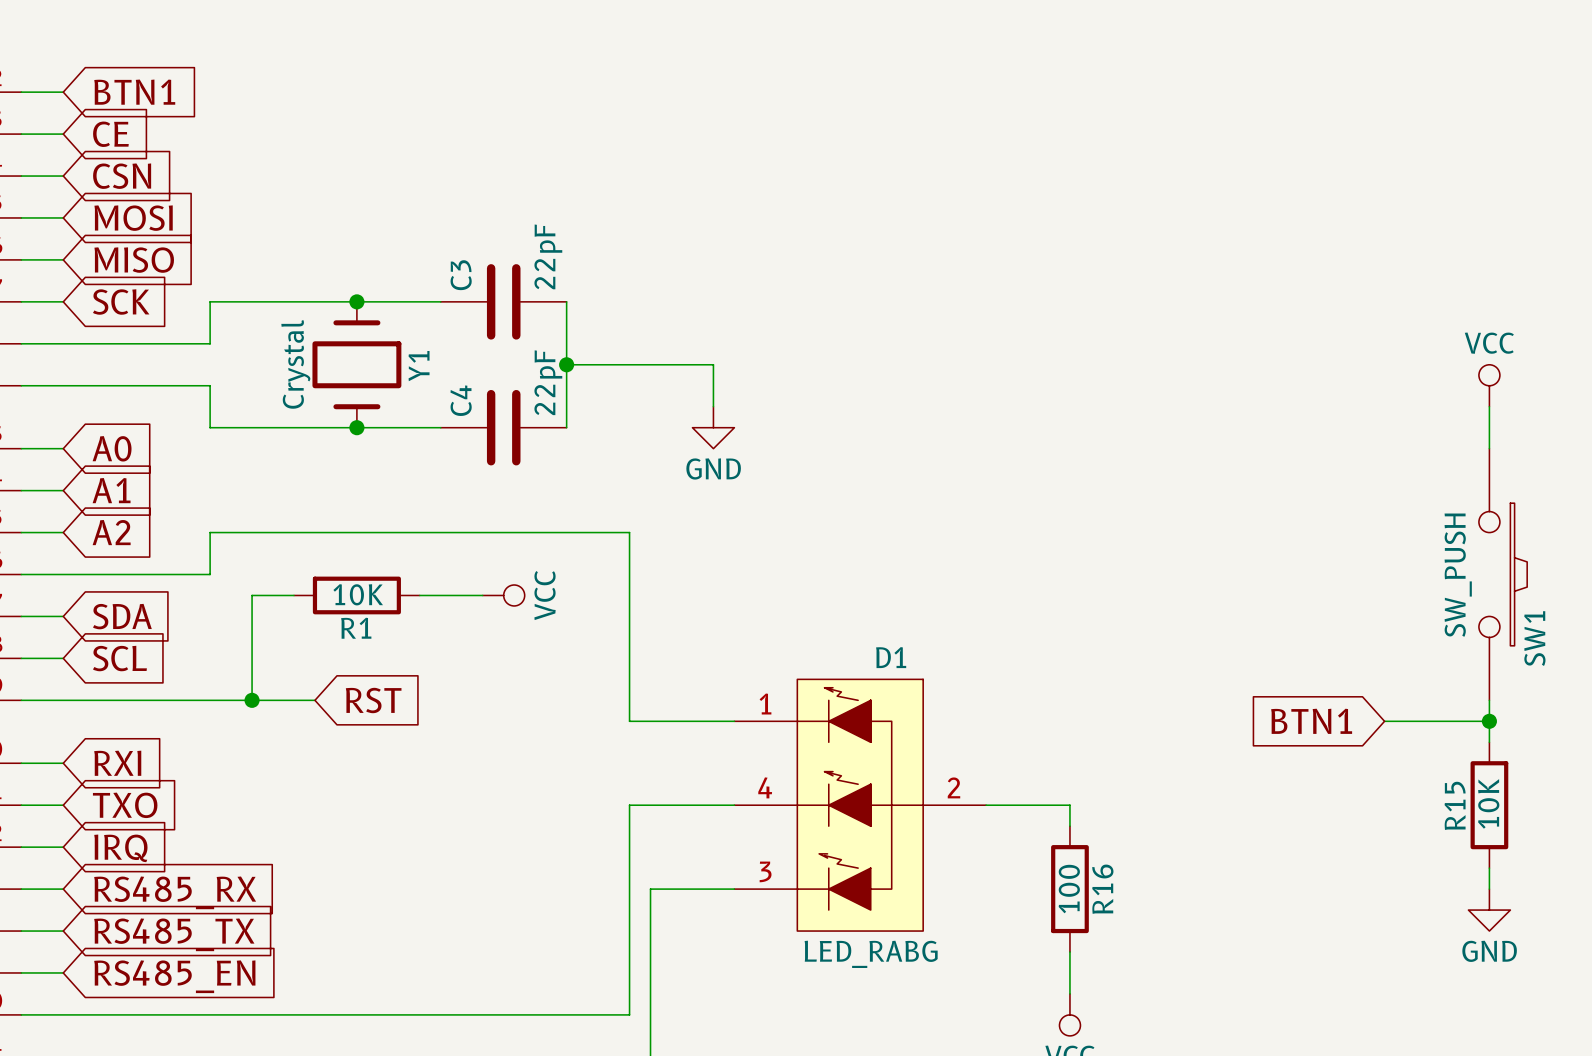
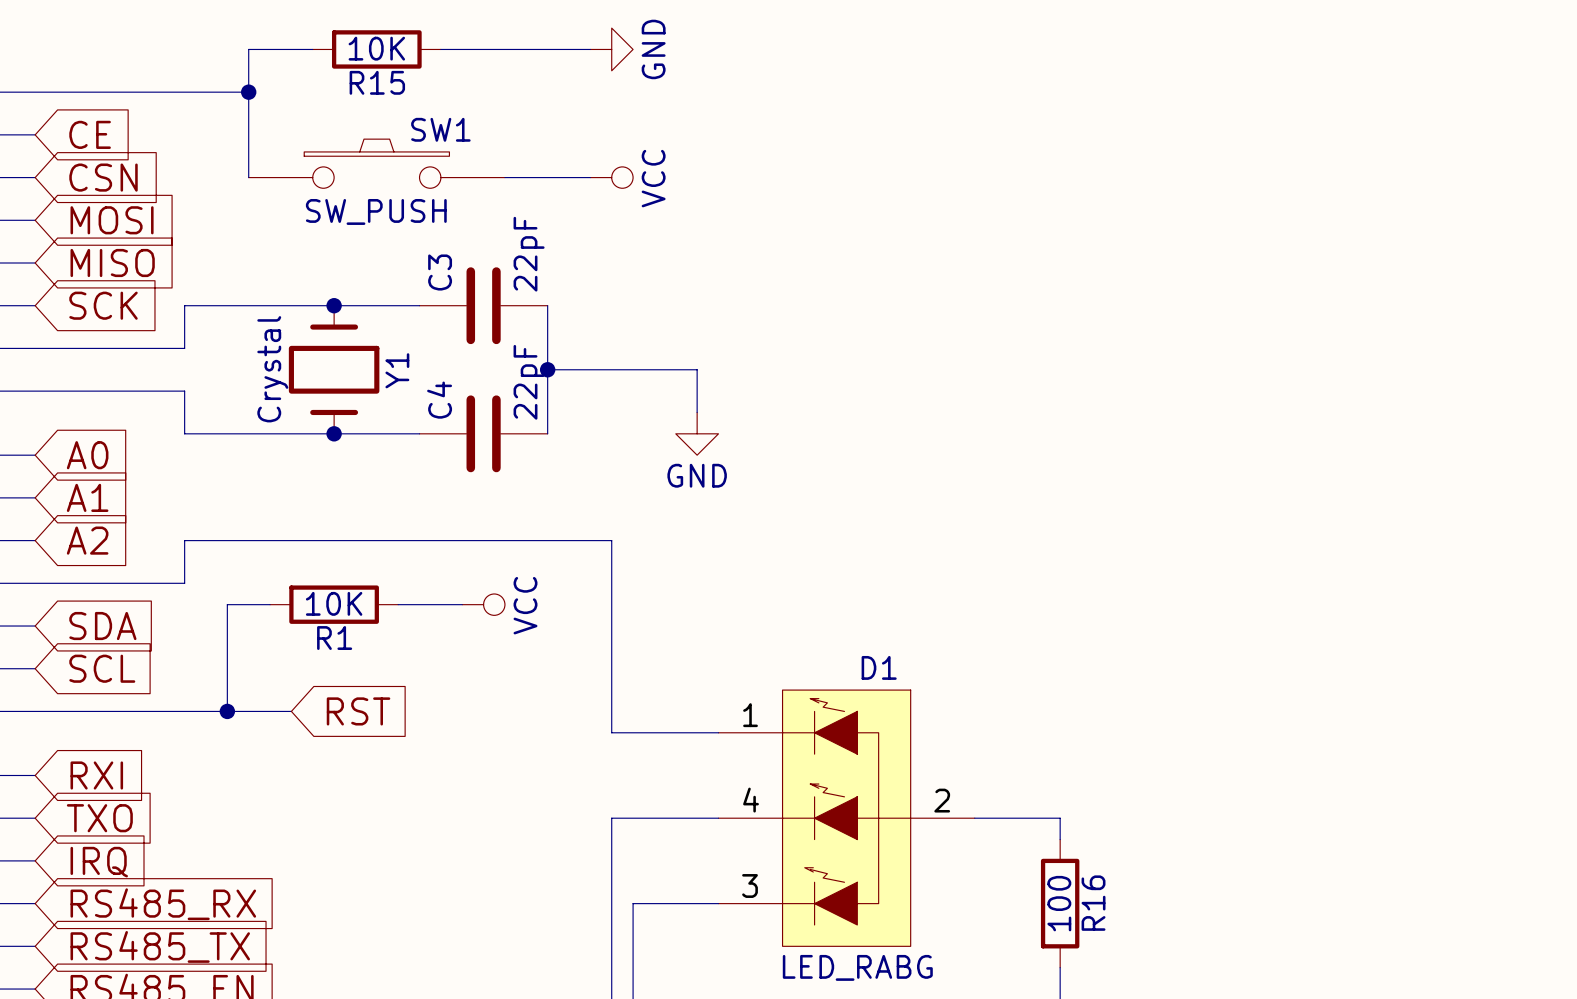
wire: none -> (312, 49) (248, 49) (248, 177)
wire: none -> (440, 49) (590, 49)
power symbol: none -> GND (611, 49)
wire: none -> (35, 92) (248, 92)
global label: BTN1 (134, 92) -> none
junction: none -> (248, 92)
wire: none -> (504, 177) (590, 177)
power symbol: none -> VCC (611, 177)
power symbol: VCC (1489, 385) -> none
wire: (1489, 406) (1489, 448) -> none
SW1 position: (1503, 574) -> (376, 163)
SW1 rotation: 0° (1518, 574) -> 90° counterclockwise (376, 147)
wire: (1489, 700) (1489, 742) -> none
global label: BTN1 (1311, 721) -> none
wire: (1384, 721) (1489, 721) -> none
junction: (1489, 721) -> none
R15 name position: R15 (1455, 805) -> R15 (377, 82)
R15 rotation: 0° (1489, 805) -> 90° clockwise (376, 49)
R15 position: (1489, 805) -> (376, 49)
wire: (1489, 868) (1489, 889) -> none
power symbol: GND (1489, 910) -> none

